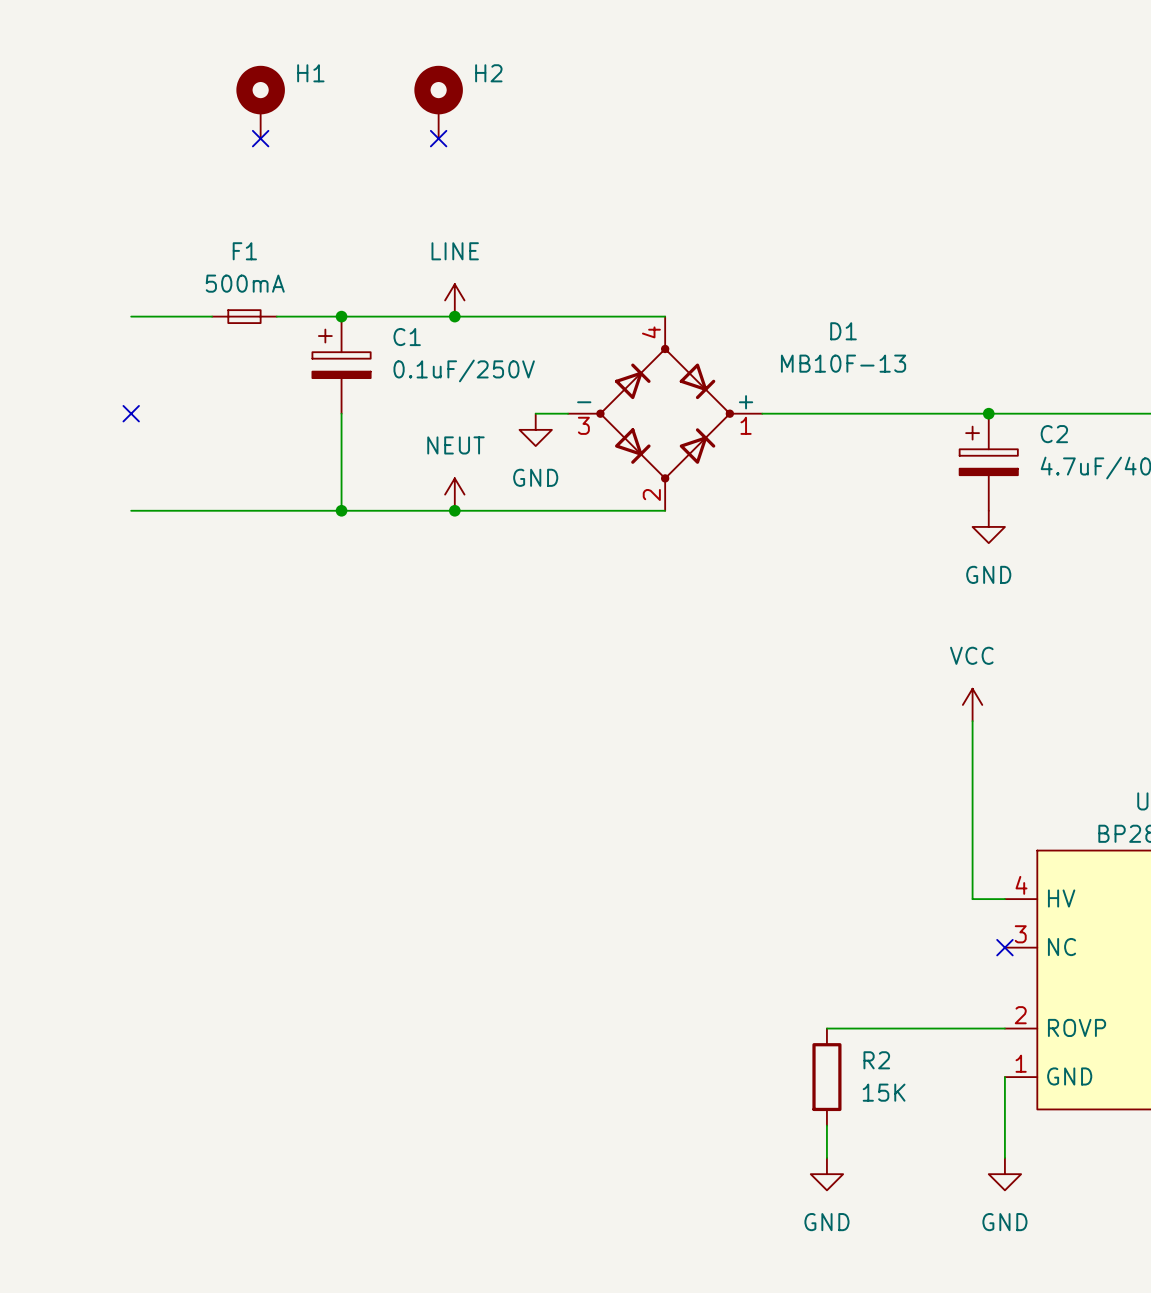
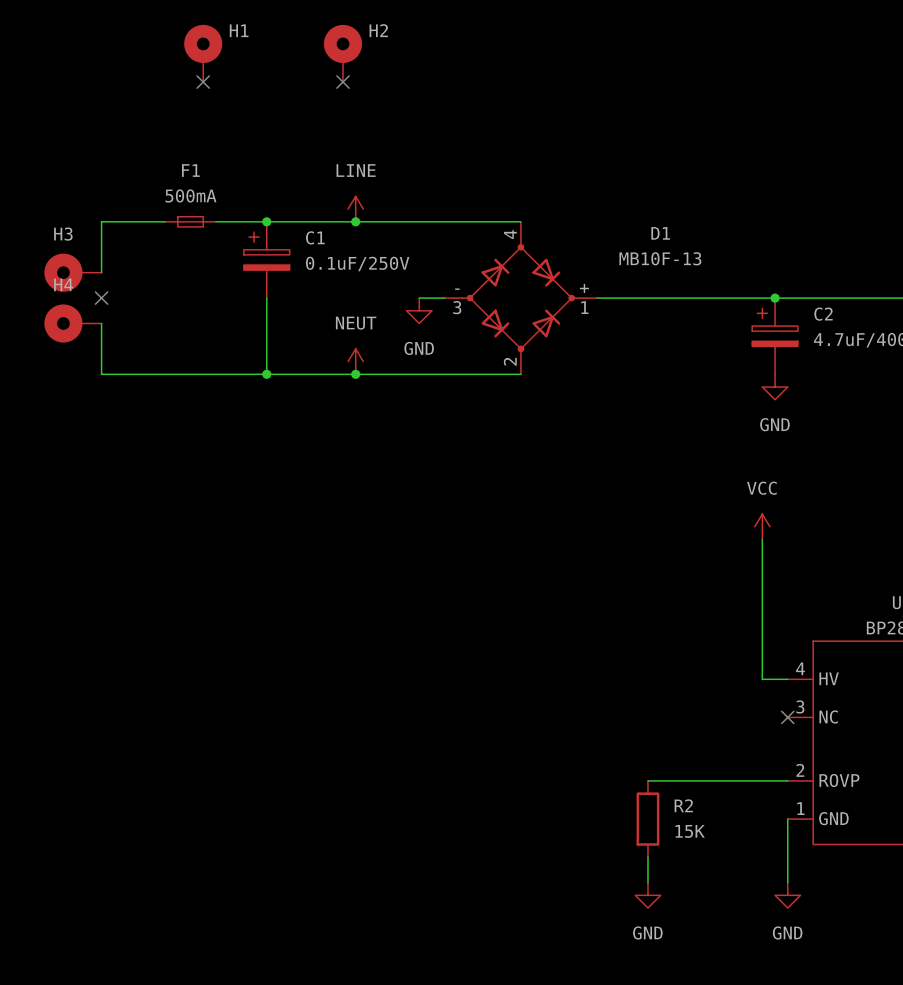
wire: none -> (101, 221) (101, 272)
H3: none -> (72, 272)
H4: none -> (72, 323)
wire: none -> (101, 323) (101, 374)

